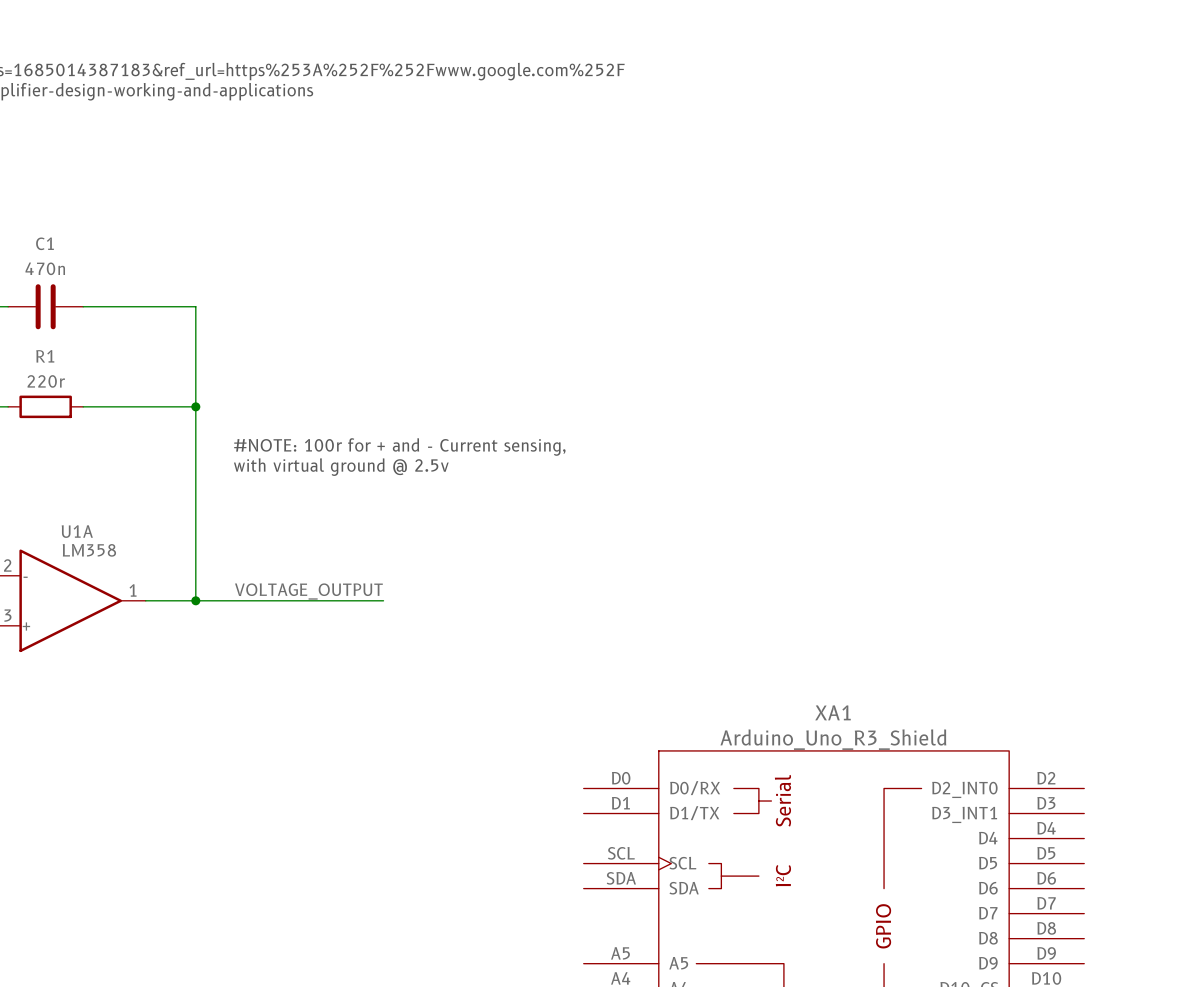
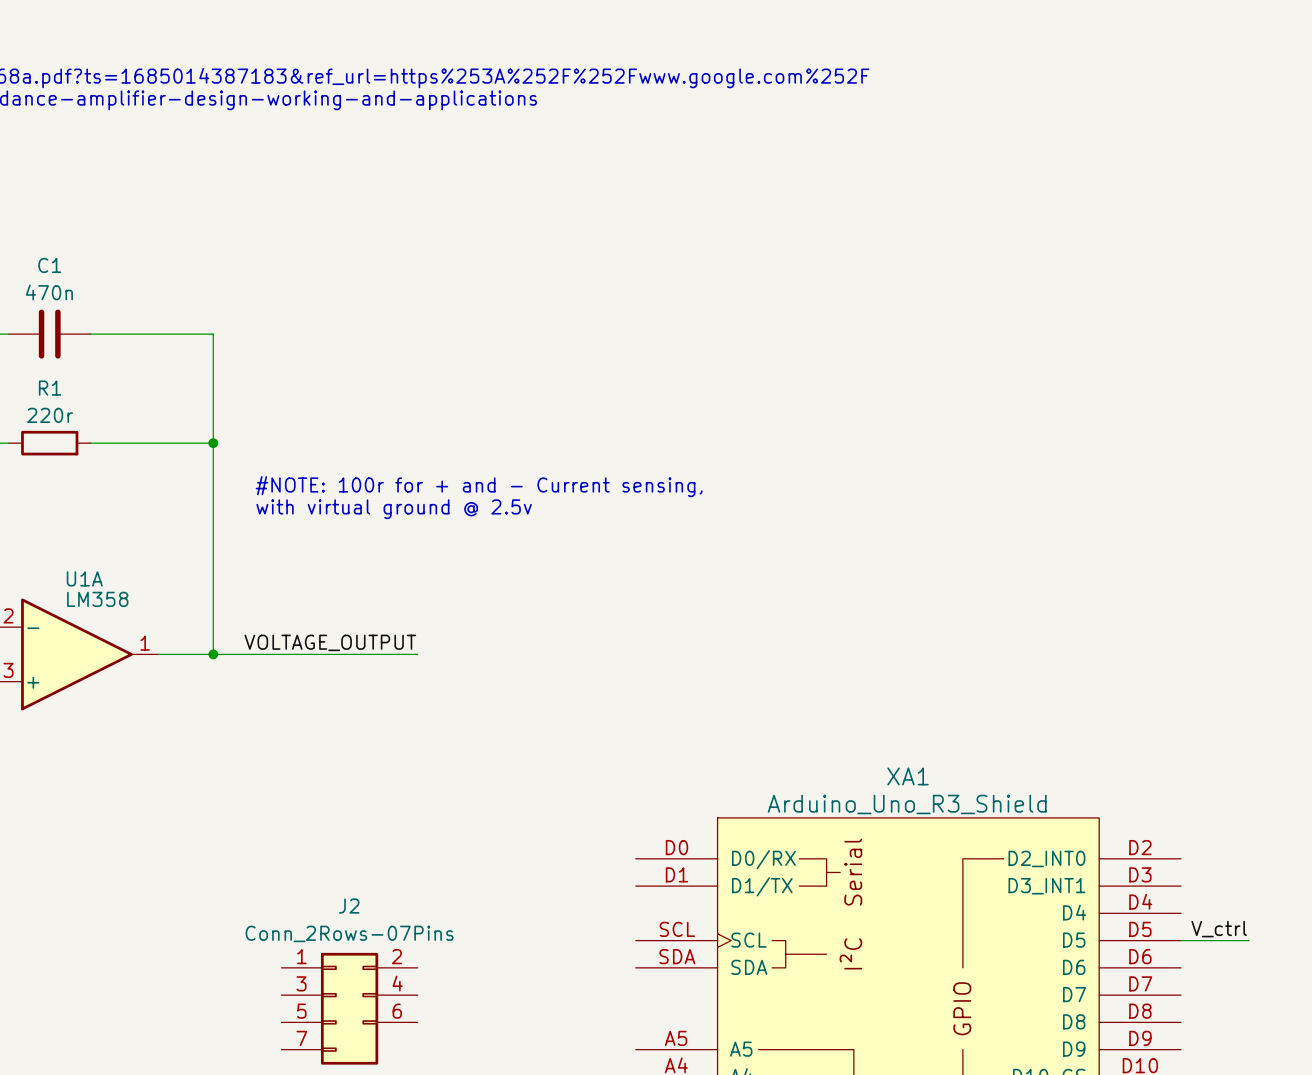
label: none -> V_ctrl (1219, 929)
wire: none -> (1180, 940) (1249, 940)
J2: none -> Conn_2Rows-07Pins (349, 1008)

